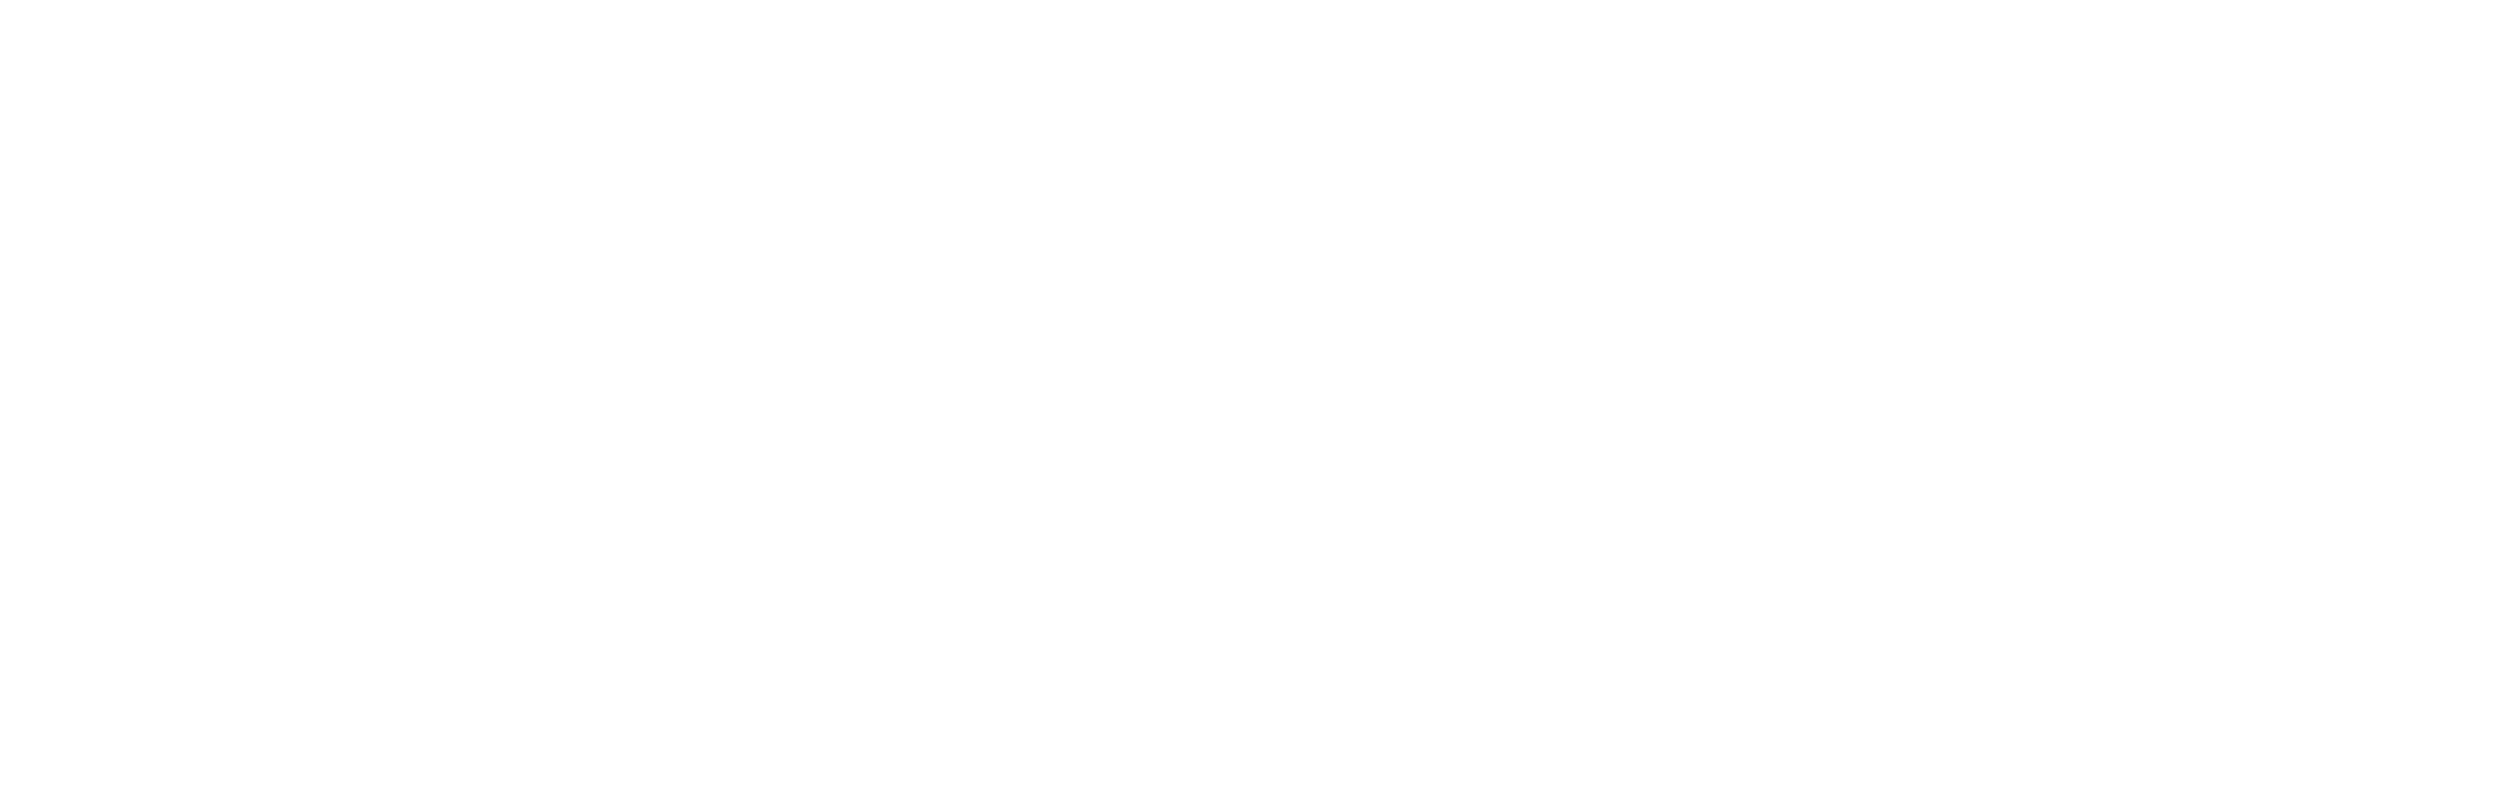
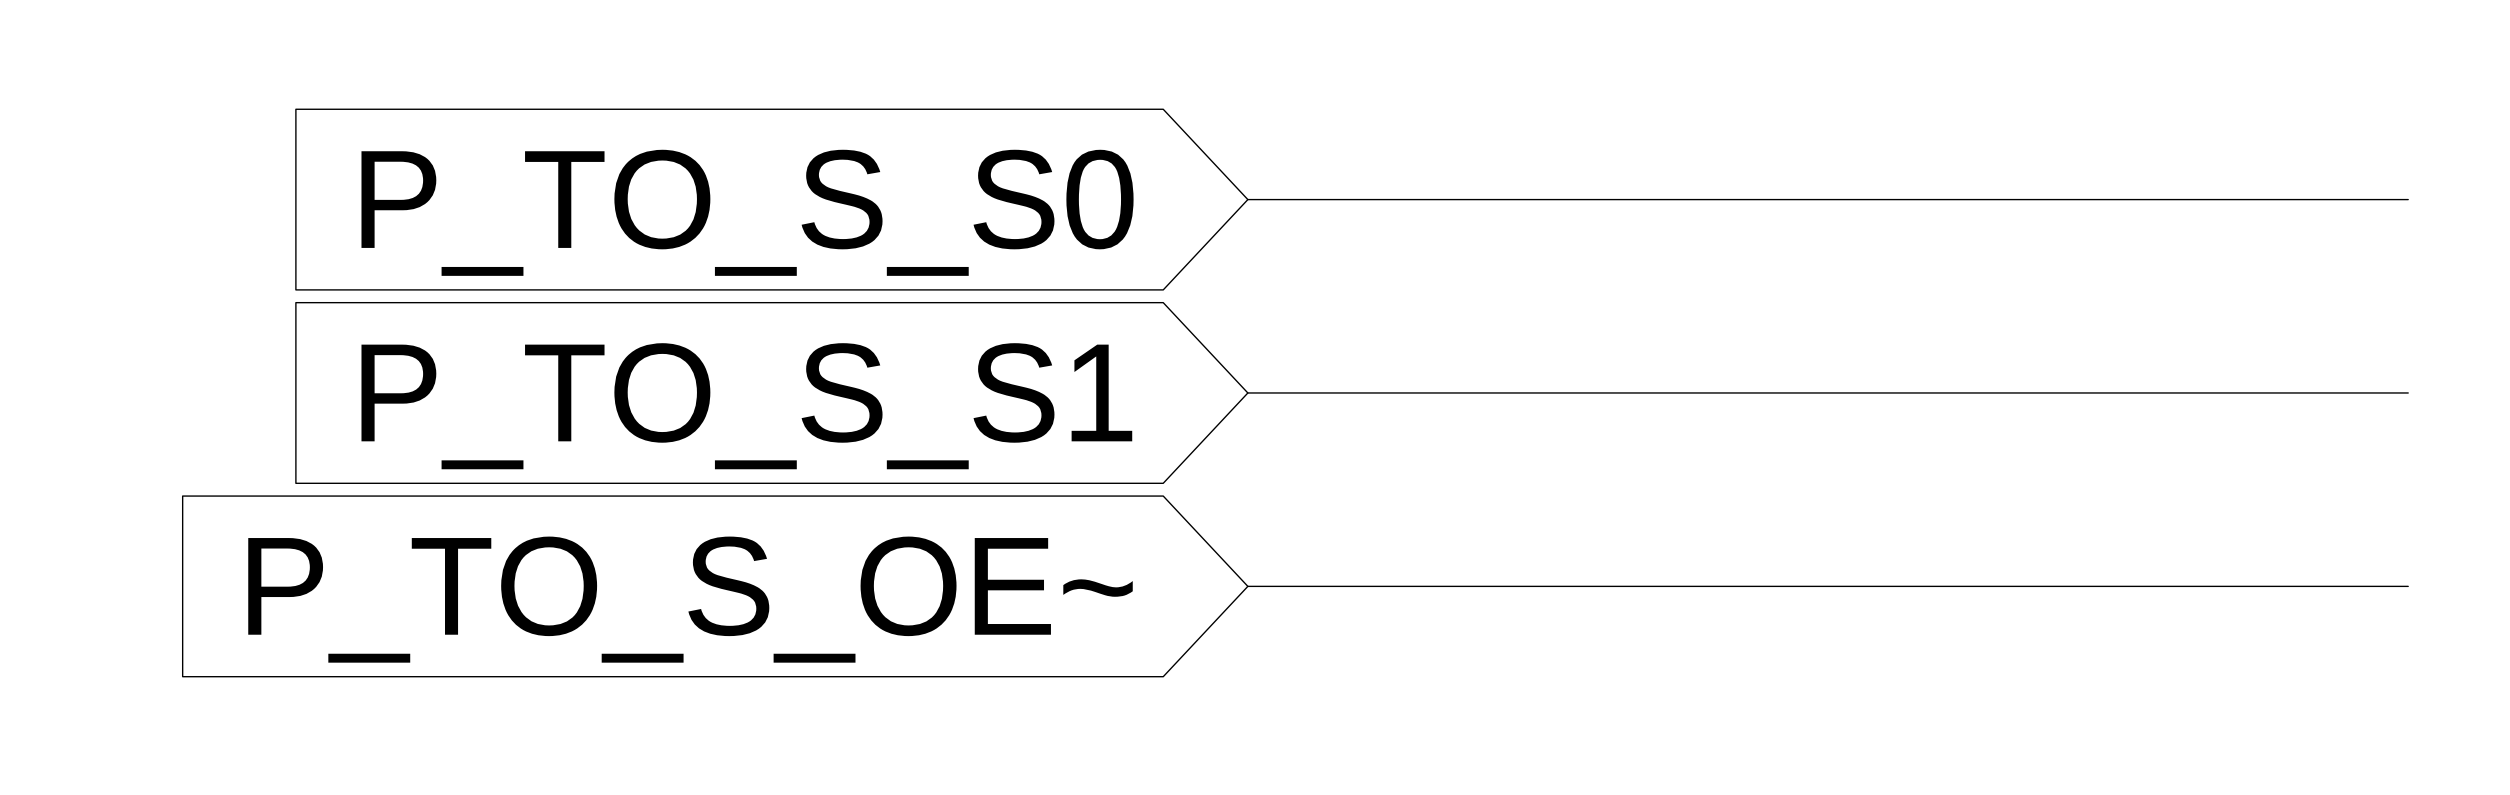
wire: none -> (1247, 199) (2408, 199)
global label: none -> P_TO_S_S0 (747, 212)
wire: none -> (1247, 392) (2408, 392)
global label: none -> P_TO_S_S1 (746, 406)
wire: none -> (1247, 586) (2408, 586)
global label: none -> P_TO_S_OE~ (690, 599)

